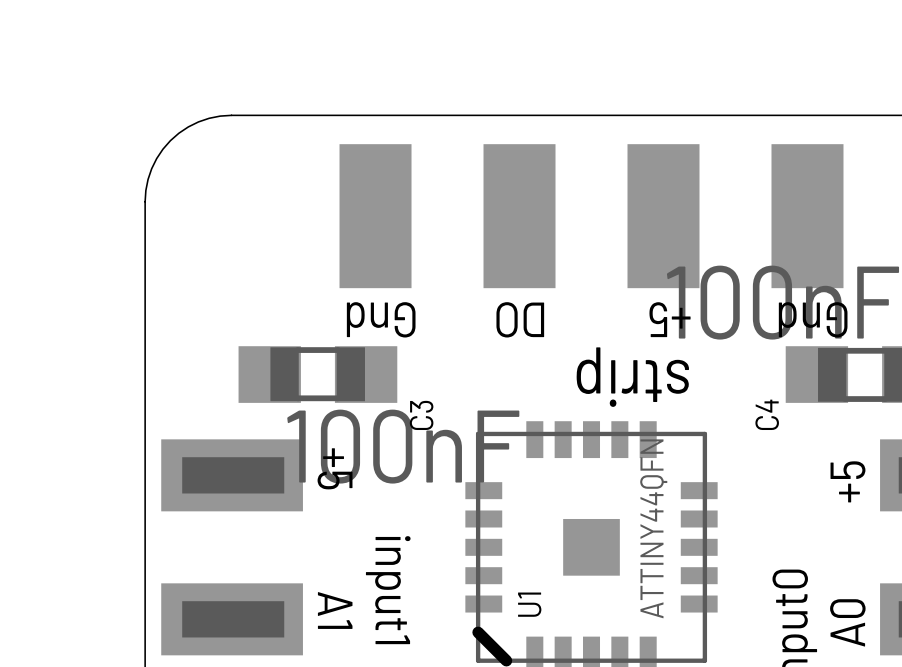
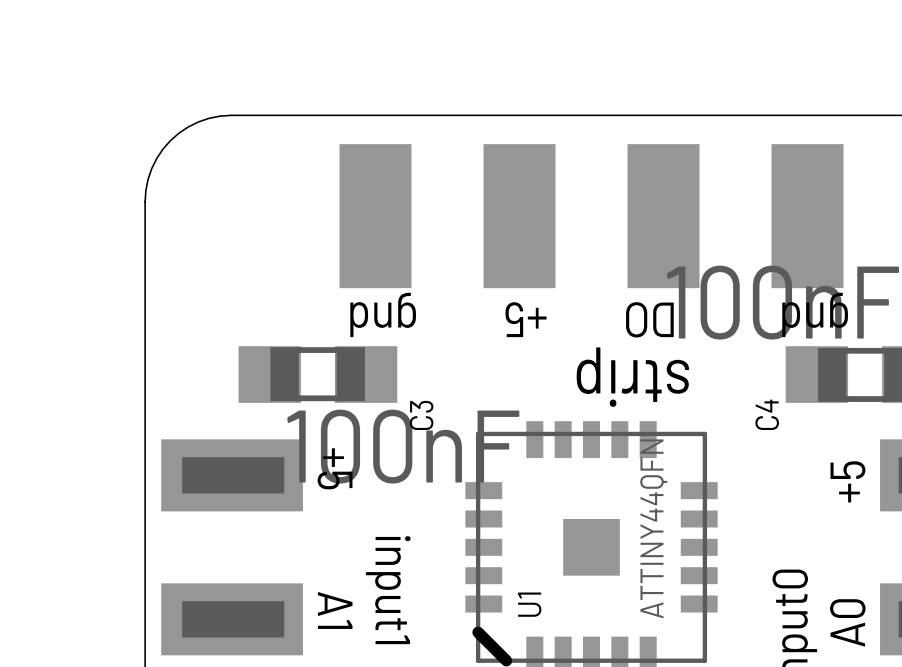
text: Gnd (381, 319) -> gnd (383, 314)
text: DO (520, 319) -> +5 (526, 319)
text: +5 (670, 319) -> DO (649, 319)
text: Gnd (813, 319) -> gnd (815, 314)

